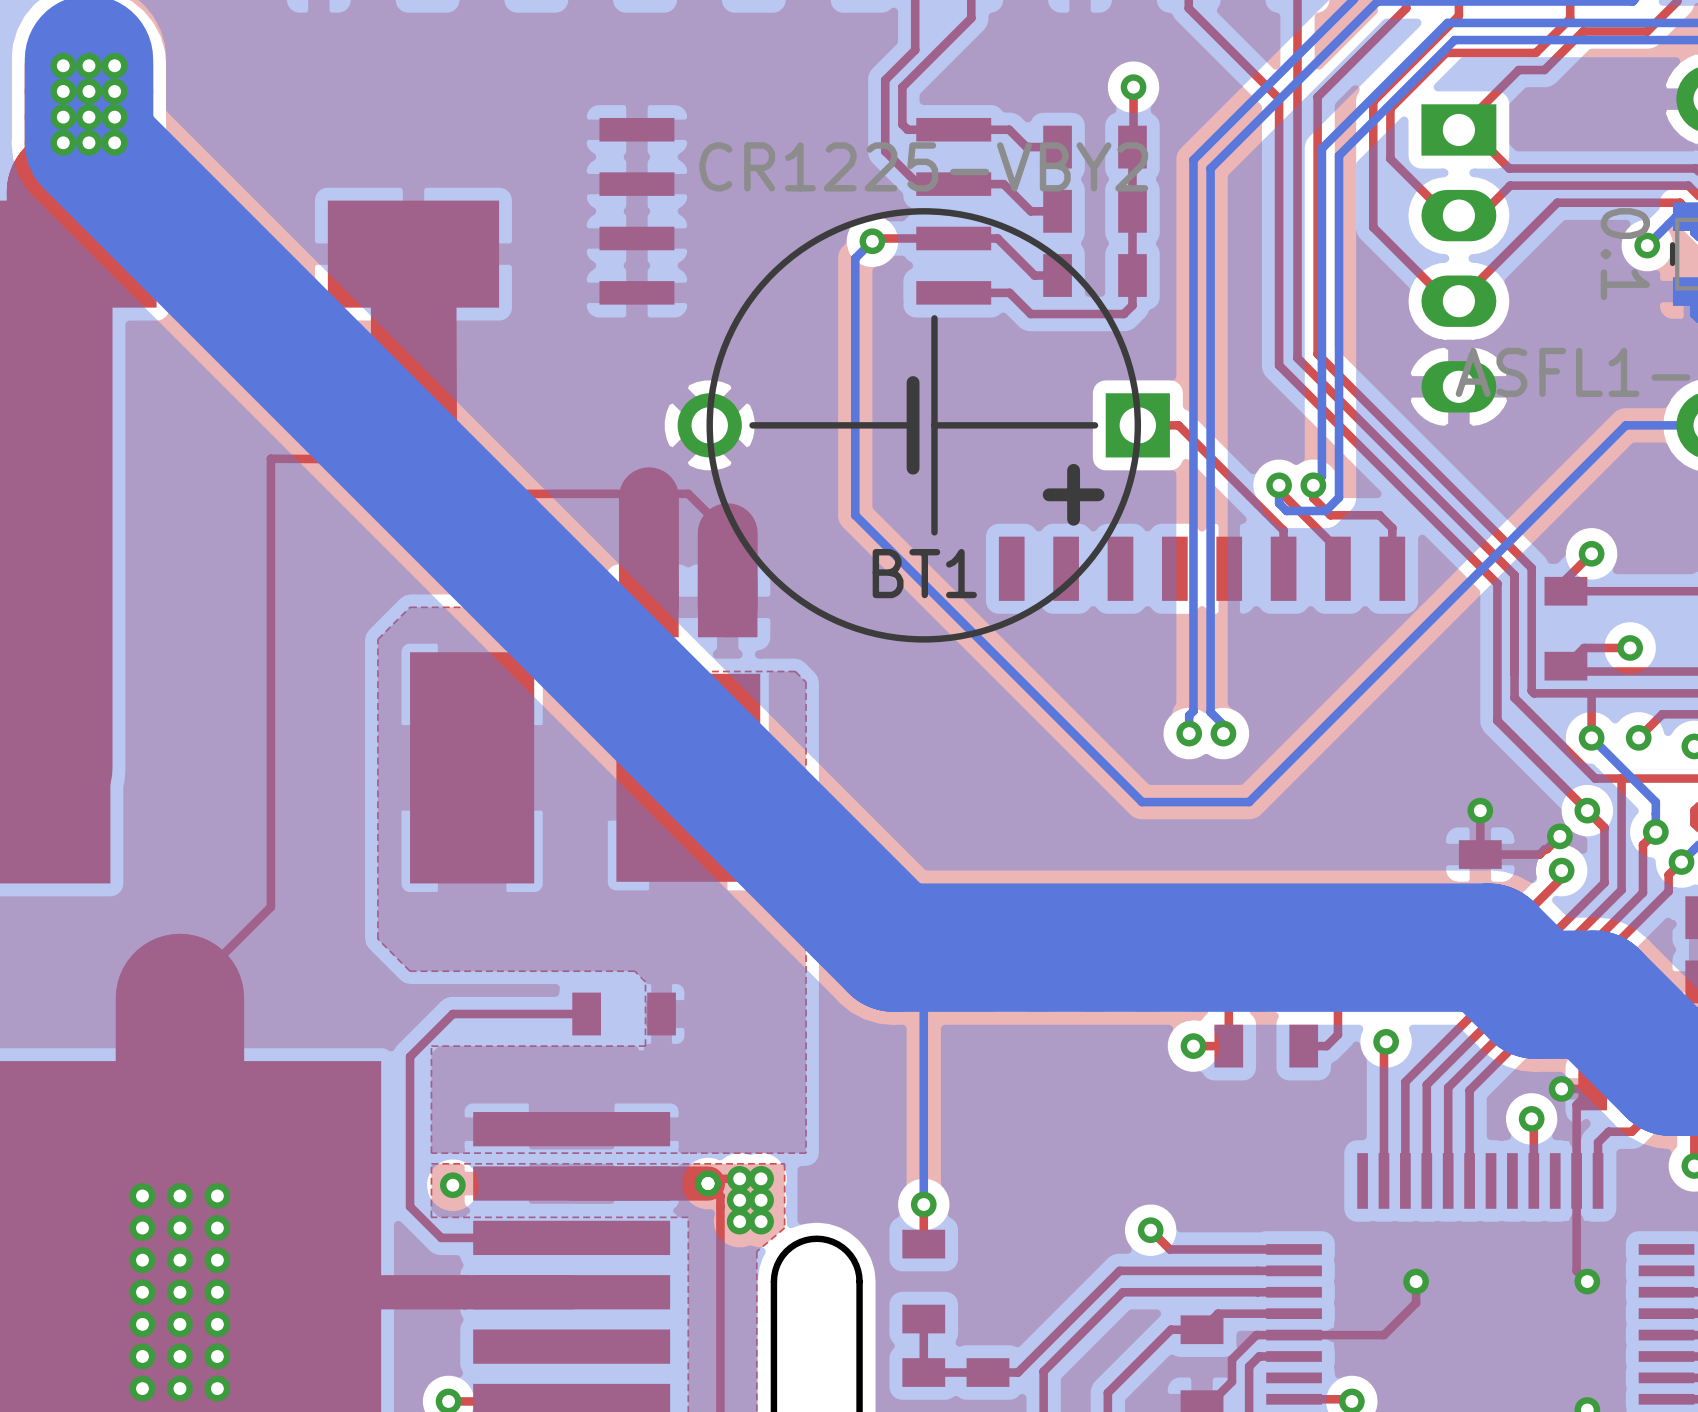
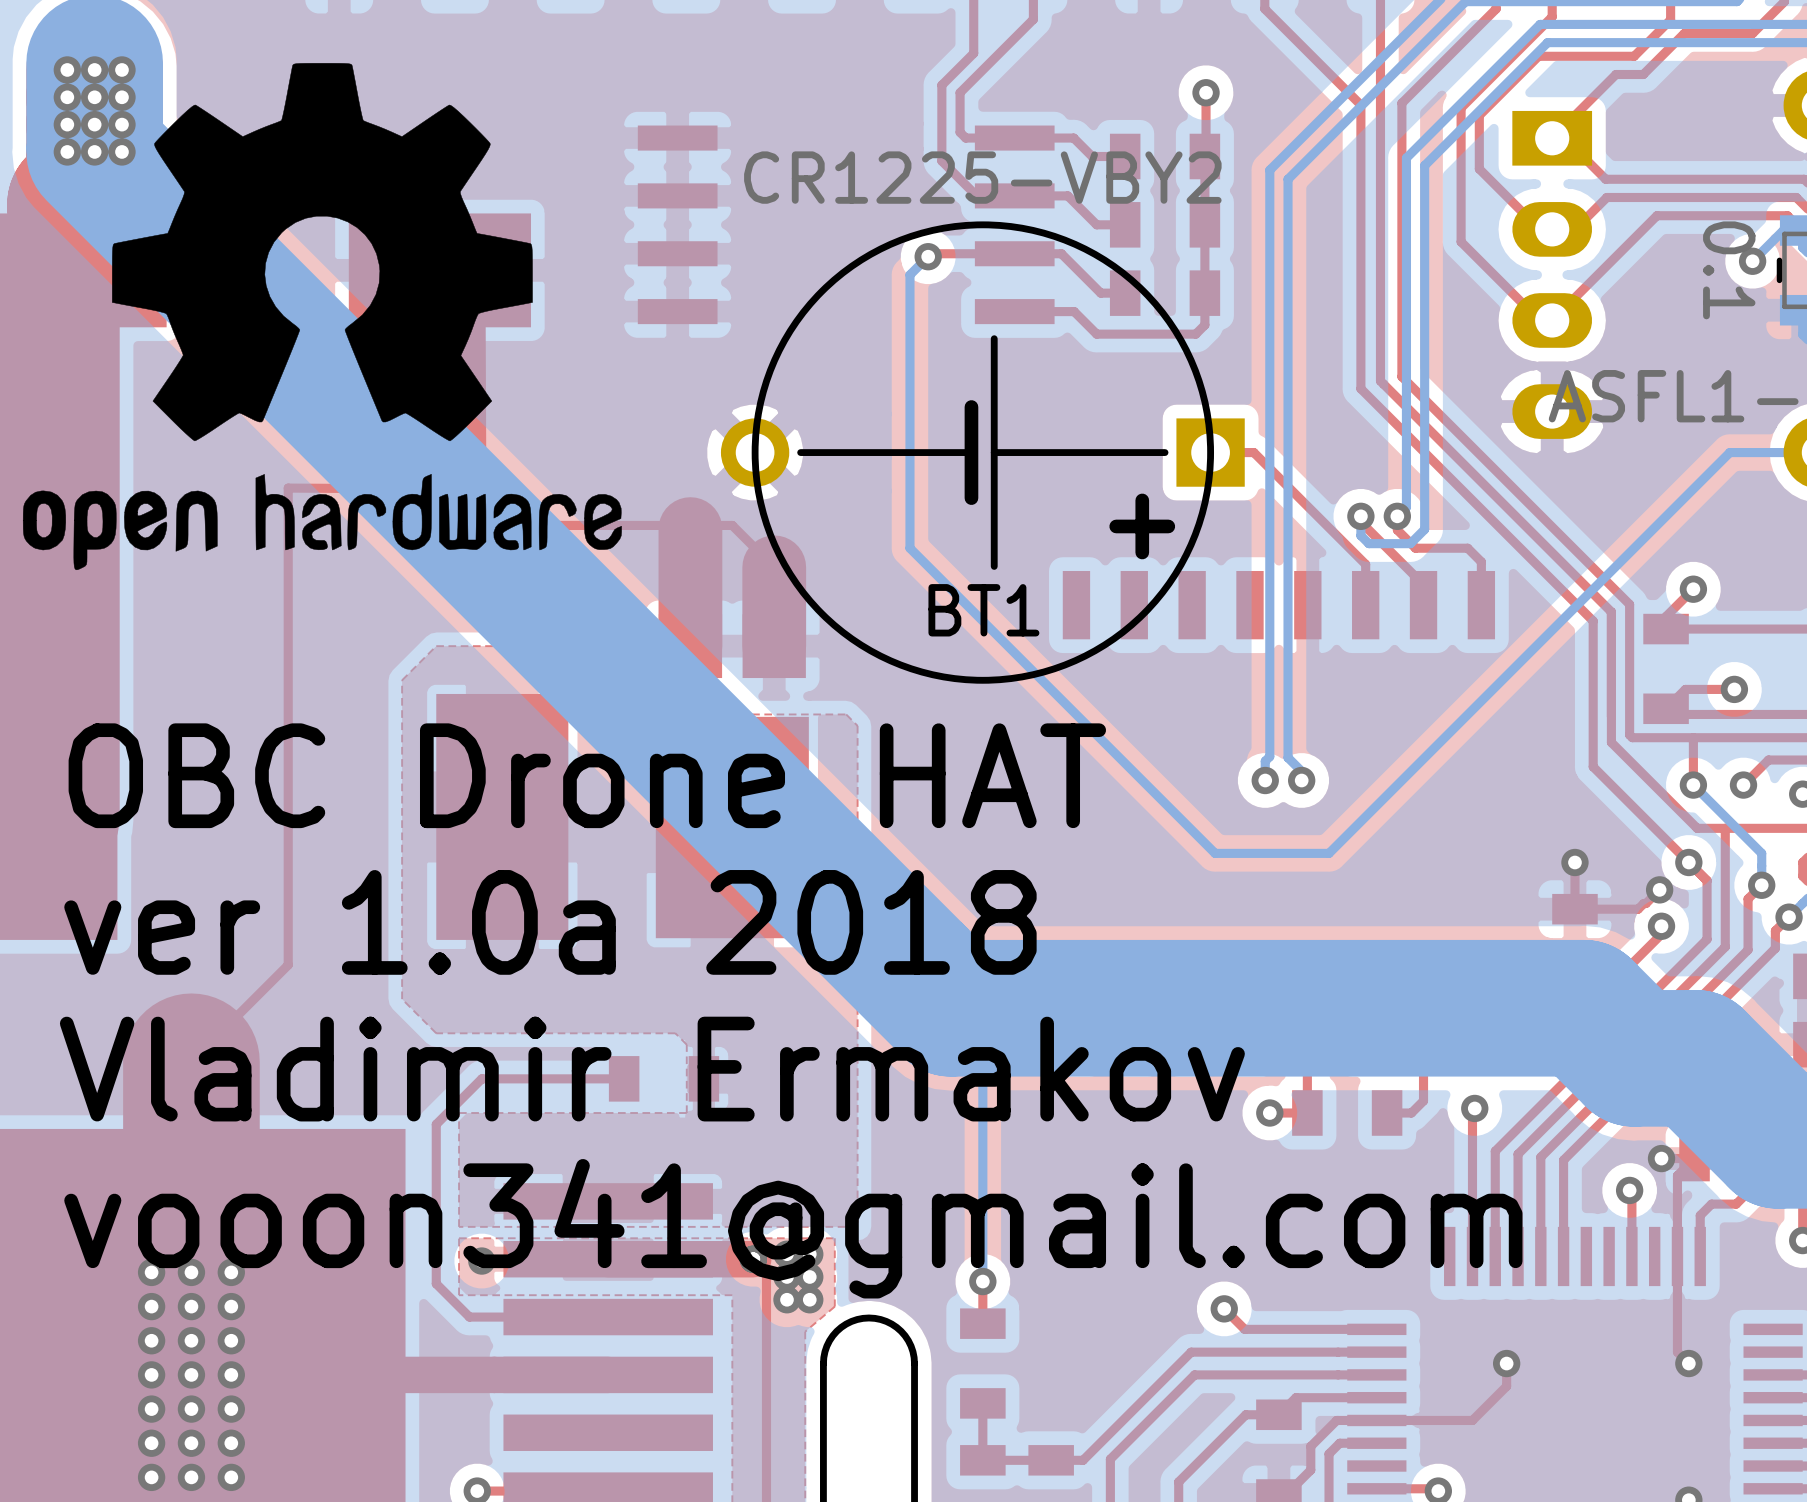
drawing: none -> [22, 63, 622, 571]
text: none -> OBC Drone HAT (587, 775)
text: none -> ver 1.0a 2018 (550, 922)
text: none -> Vladimir Ermakov (652, 1069)
text: none -> vooon341@gmail.com (793, 1228)

